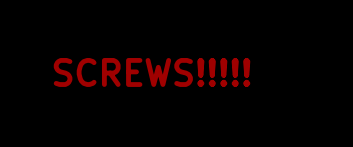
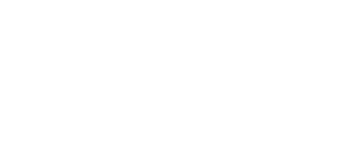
text: SCREWS!!!!! (152, 72) -> none

